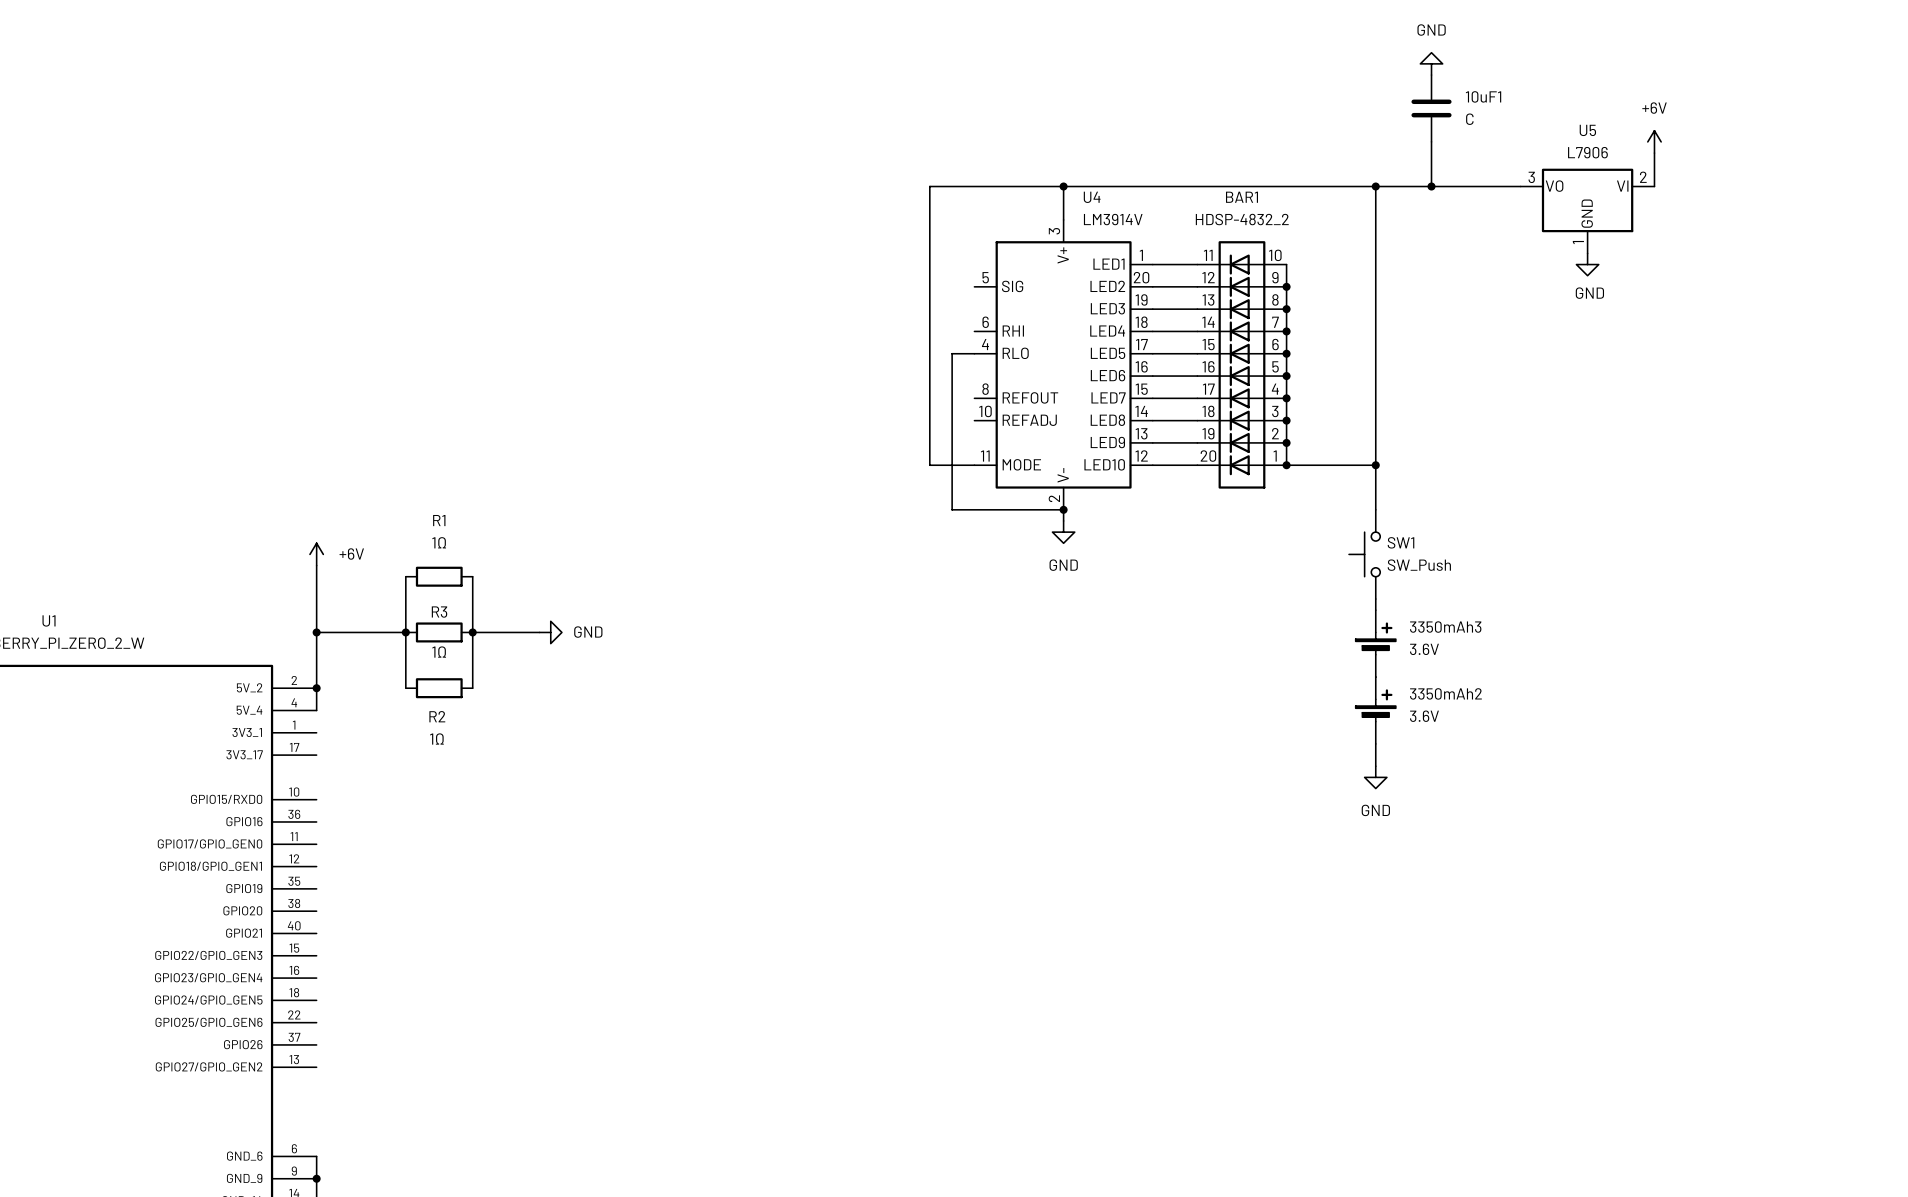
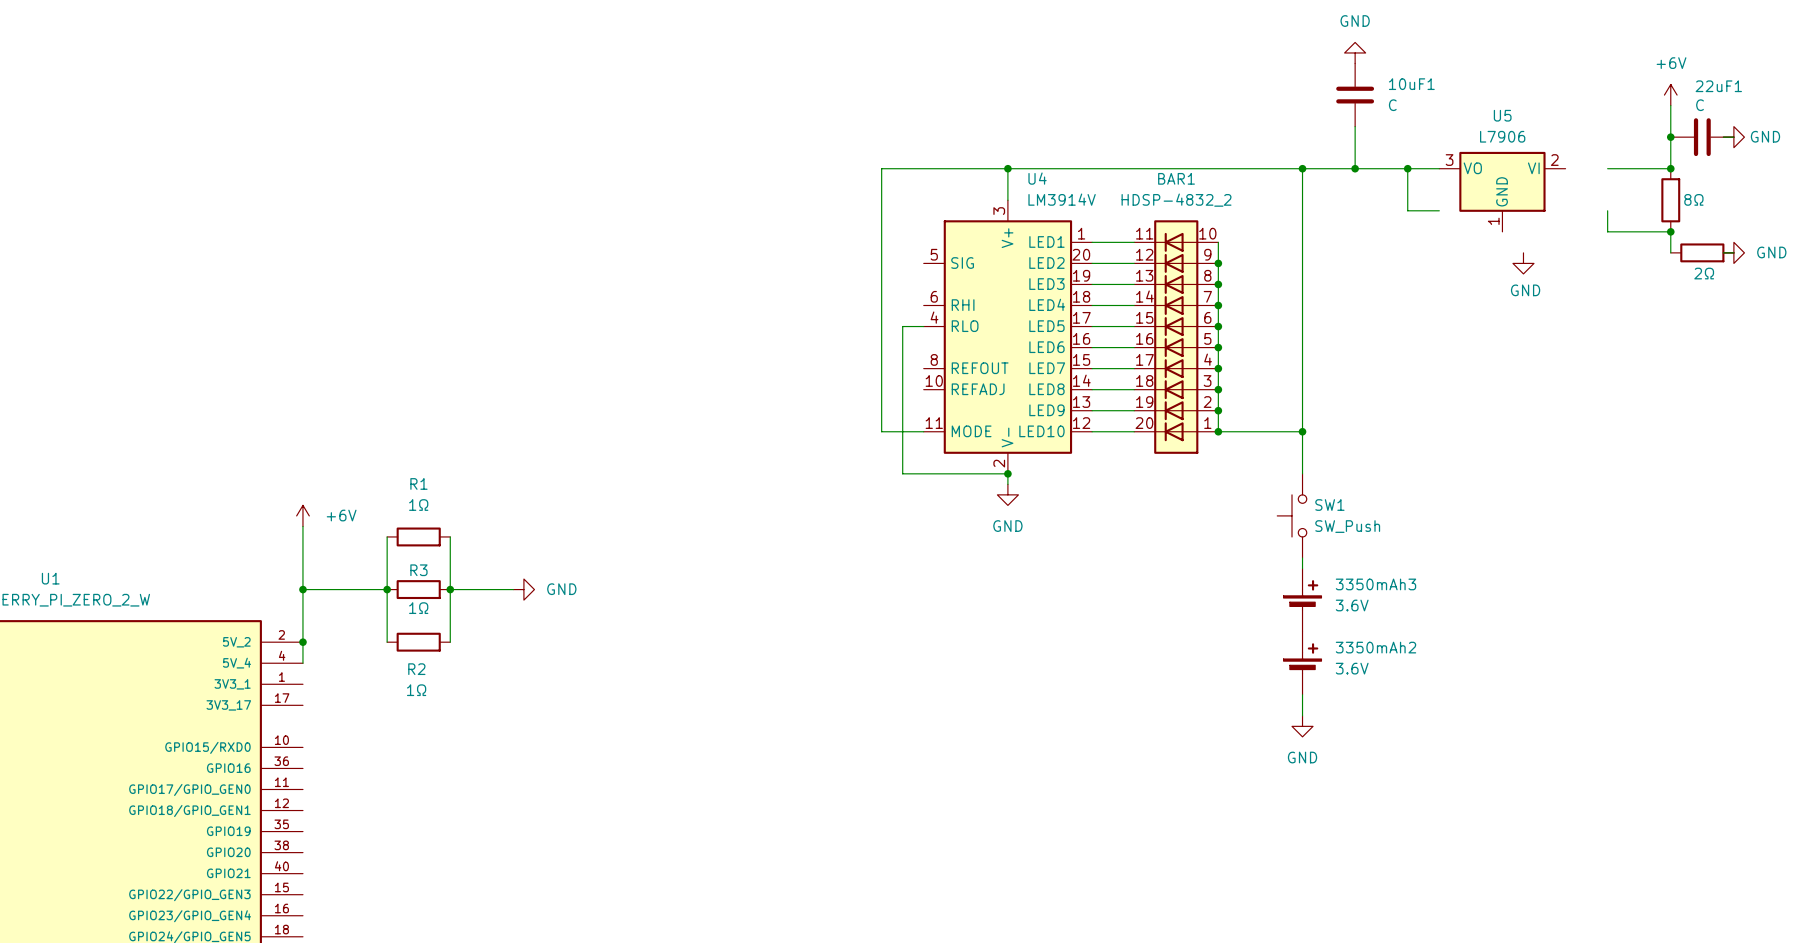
wire: none -> (1670, 105) (1670, 168) (1607, 168)
power symbol position: +6V (1654, 141) -> +6V (1670, 95)
wire: (1654, 153) (1654, 186) -> none
junction: none -> (1670, 137)
22uF1: none -> C (1702, 137)
wire: none -> (1723, 137) (1733, 137)
power symbol: none -> GND (1733, 137)
wire: none -> (1407, 168) (1407, 210) (1439, 210)
junction: none -> (1407, 168)
junction: none -> (1670, 168)
8Ω: none -> (1670, 200)
wire: none -> (1607, 210) (1607, 231) (1670, 231) (1670, 252)
junction: none -> (1670, 231)
power symbol position: GND (1587, 264) -> GND (1523, 263)
2Ω: none -> (1702, 252)
wire: none -> (1723, 252) (1733, 252)
power symbol: none -> GND (1733, 252)

